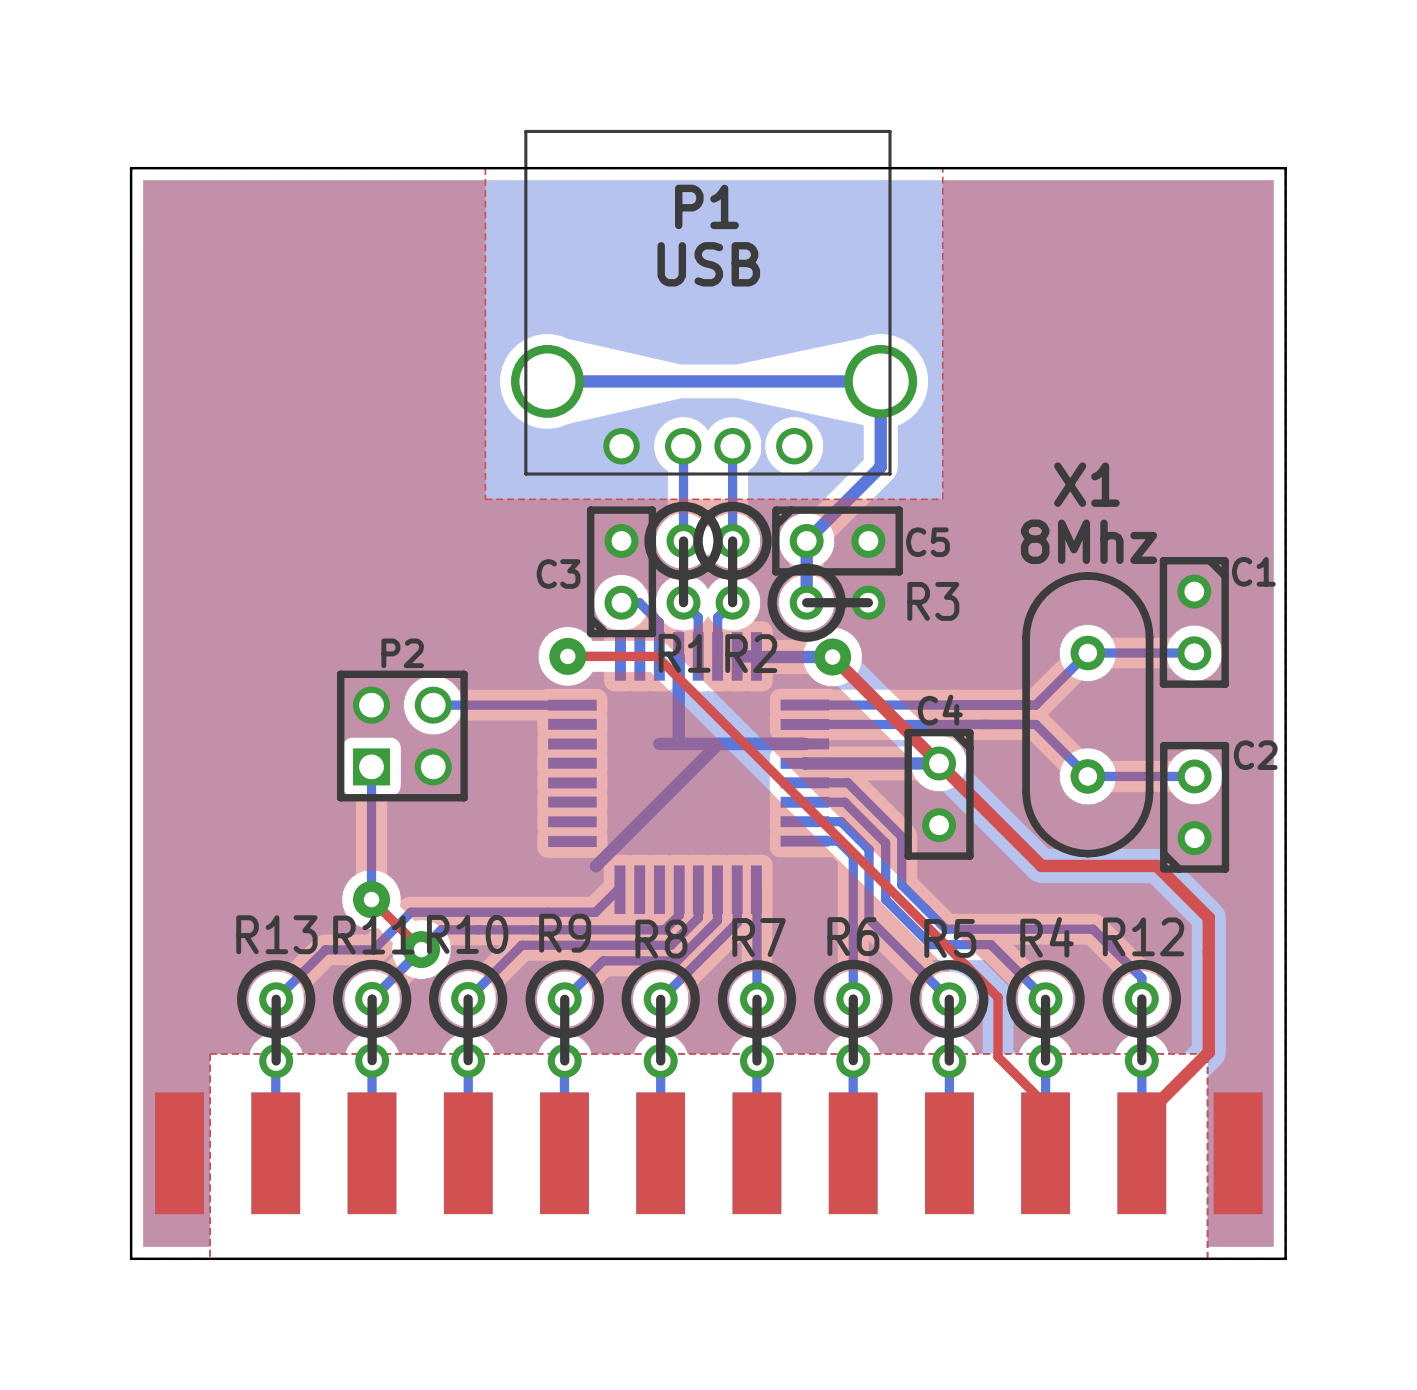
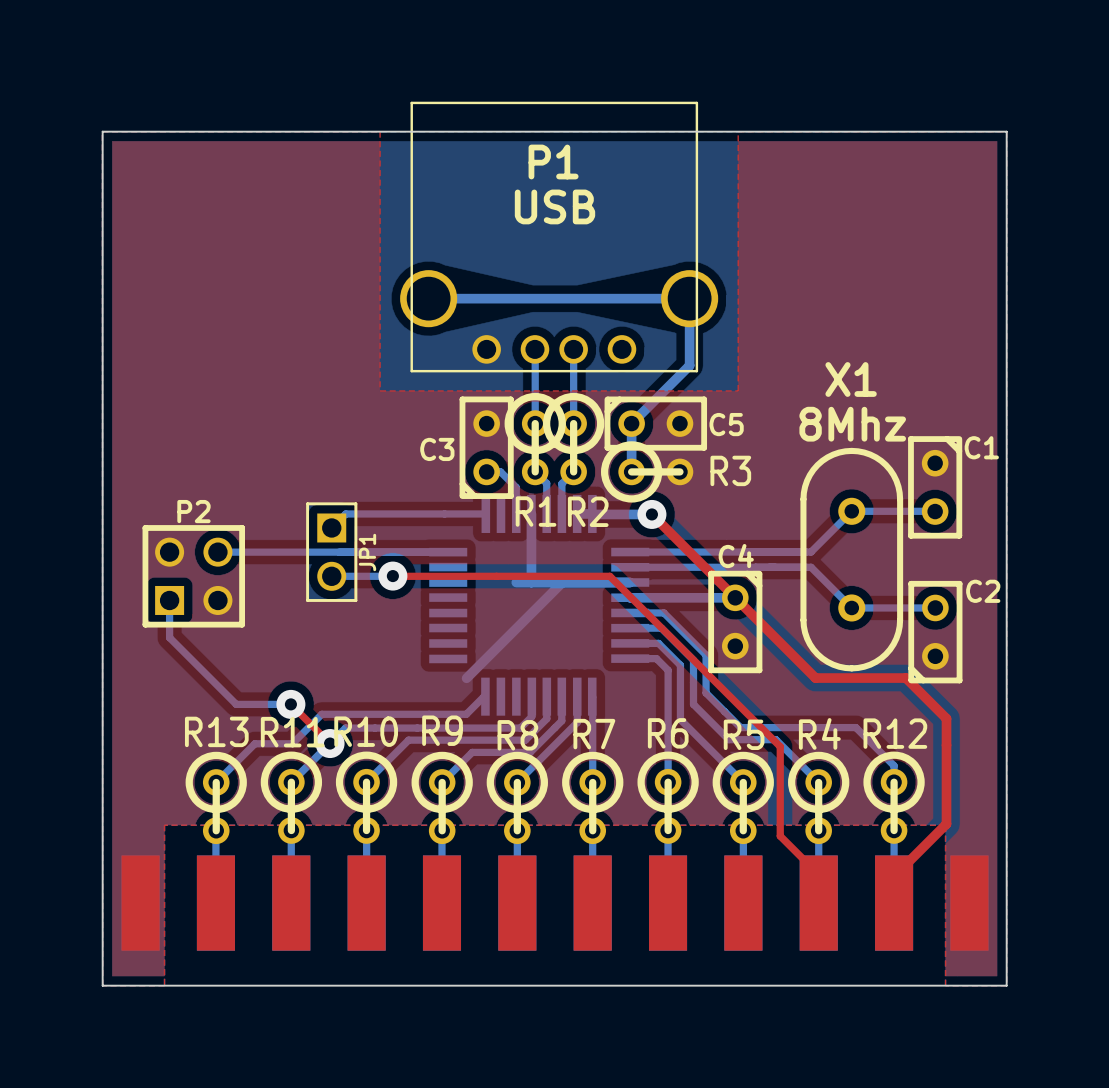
bottom track: none -> (444, 513) (345, 513) (331, 527)
top track: (567, 656) (656, 656) (998, 997) (998, 1056) (1045, 1104) -> none
via position: (567, 656) -> (392, 576)
bottom track: none -> (217, 552) (339, 552)
JP1: none -> (331, 552)
P2 position: (402, 736) -> (193, 576)
bottom track: none -> (331, 576) (392, 576)
top track: none -> (393, 576) (609, 576) (780, 746) (780, 836) (818, 874)
bottom track: (371, 766) (371, 899) -> (169, 600) (169, 637) (236, 704) (290, 704)

